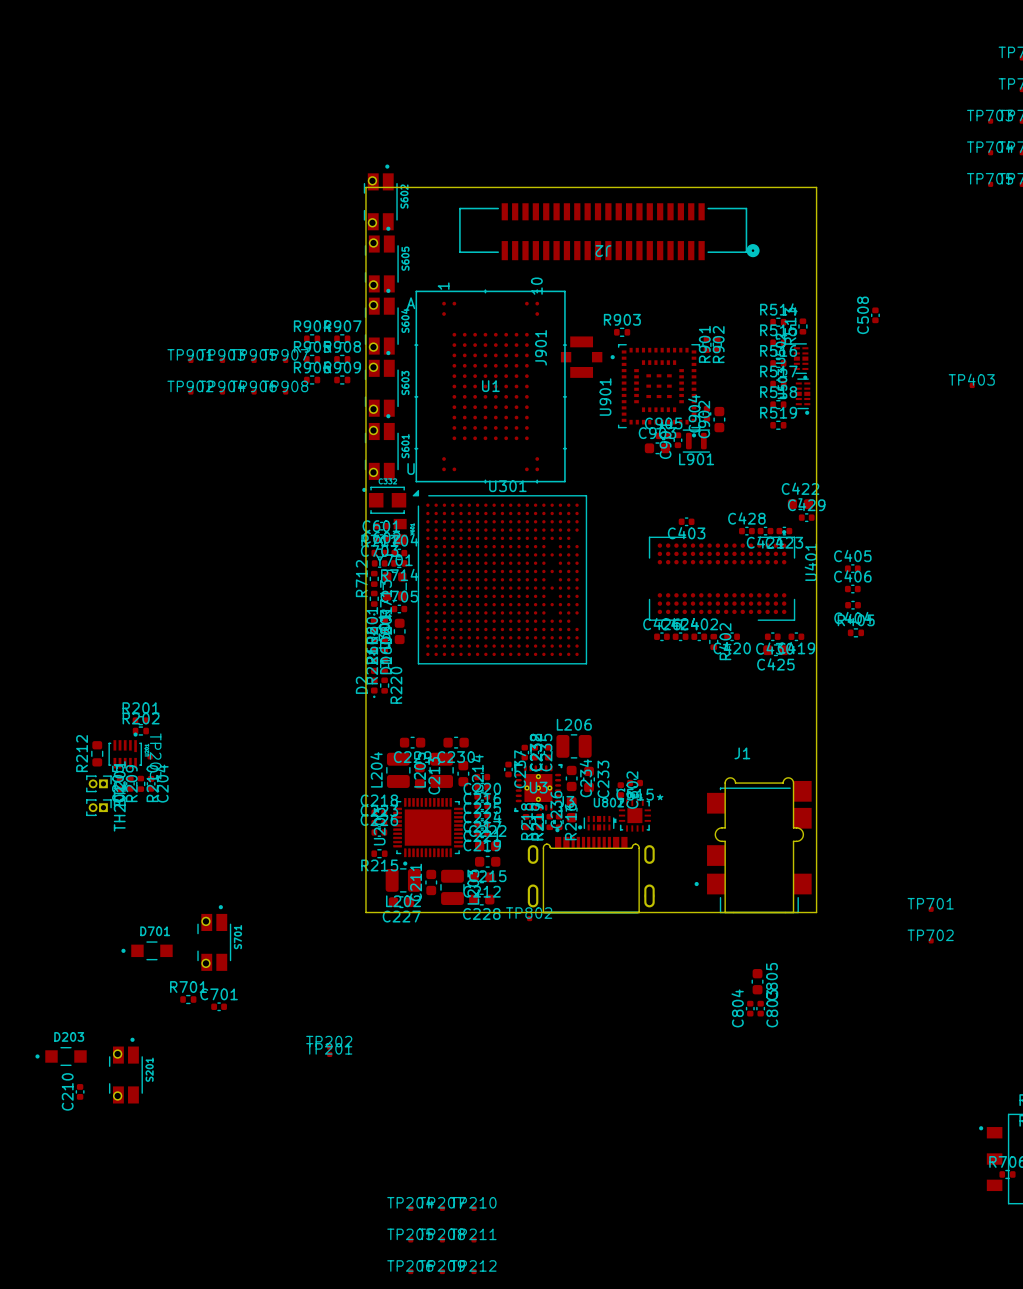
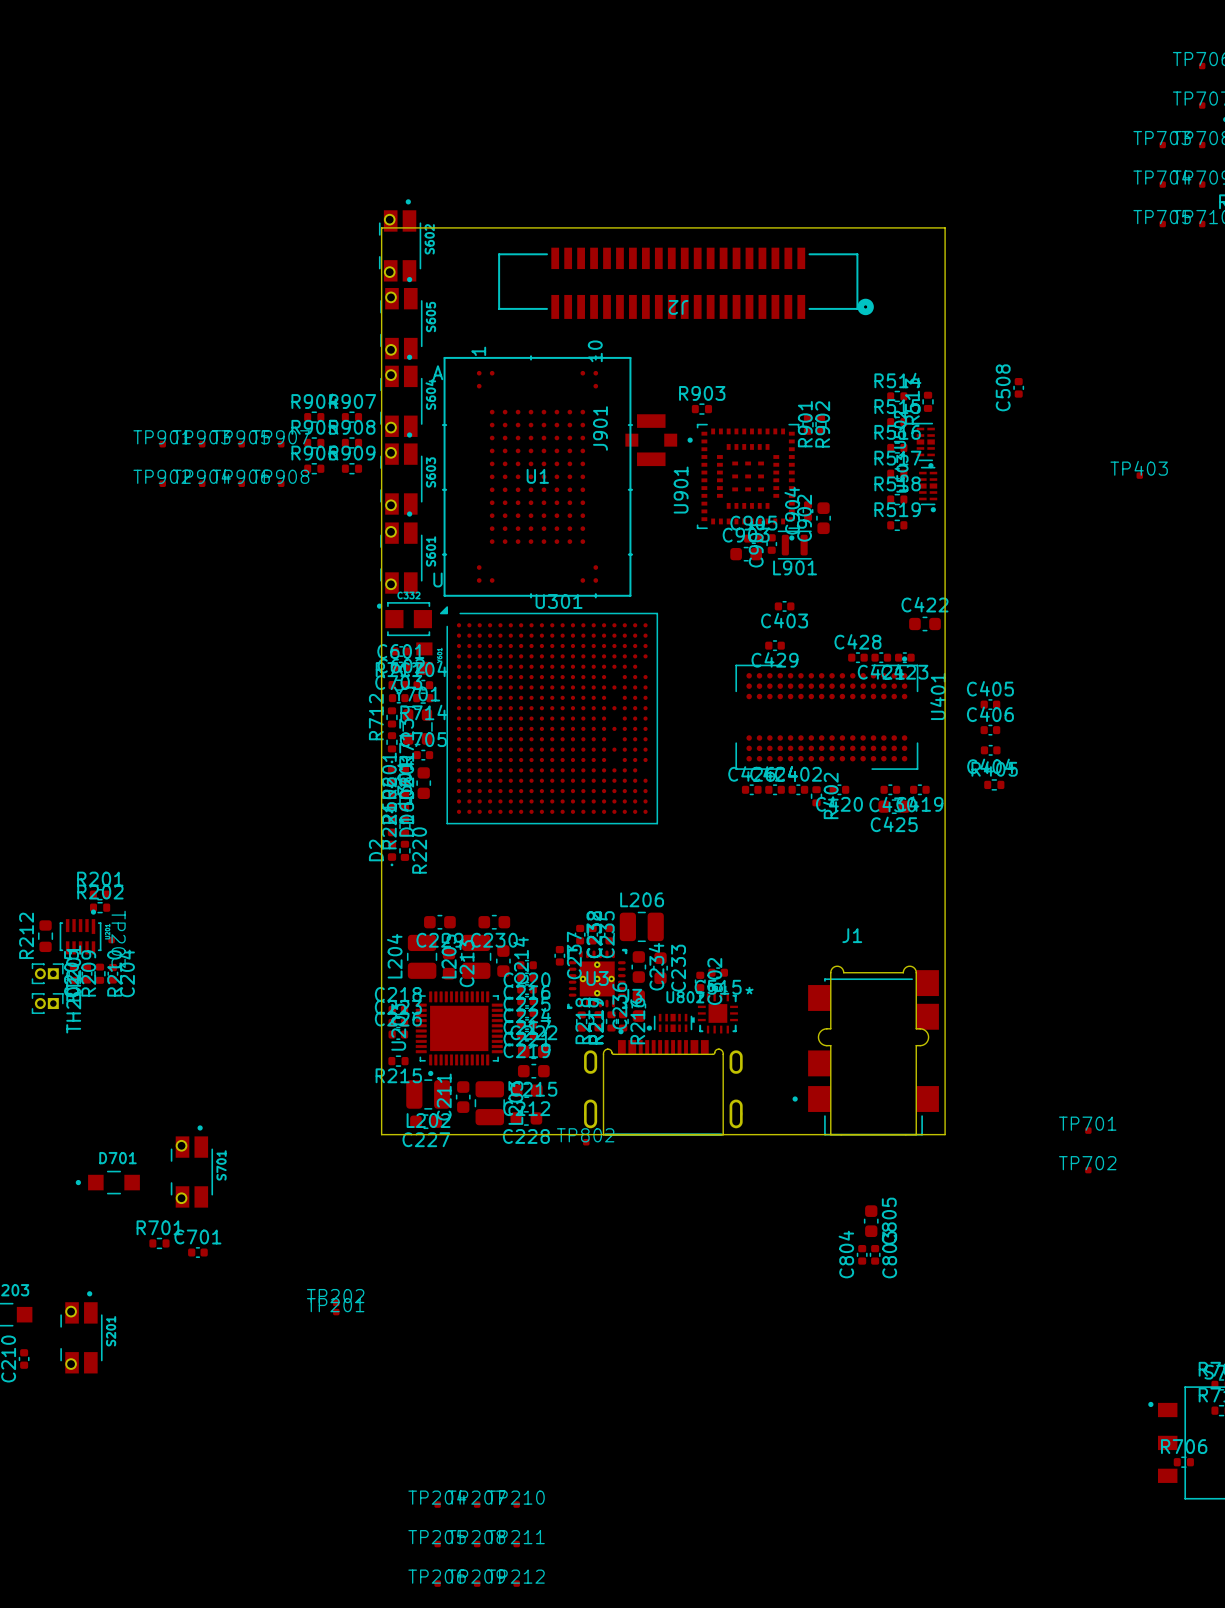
C429 name position: C429 (806, 504) -> C429 (775, 659)
C429 position: (806, 517) -> (775, 645)
C403 position: (686, 521) -> (784, 606)

